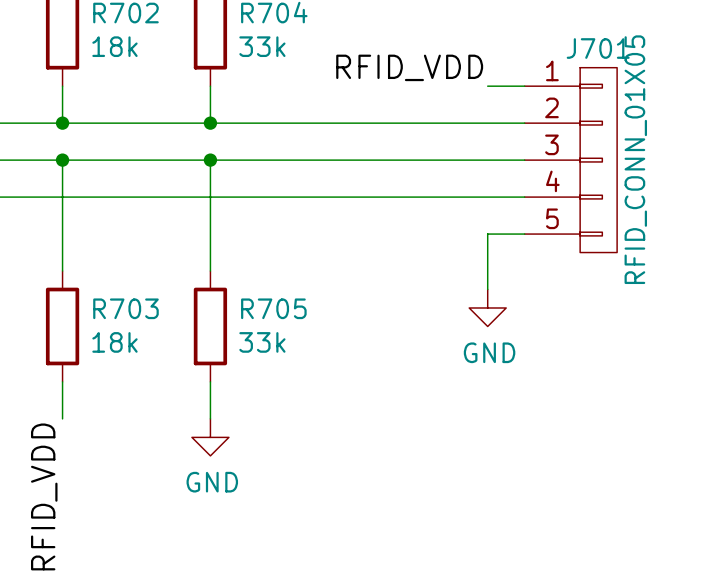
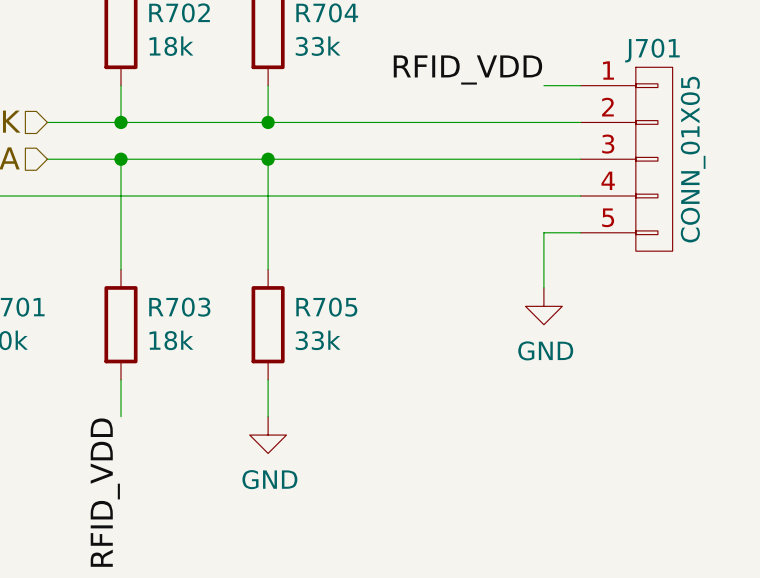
J701 value: RFID_CONN_01X05 (635, 159) -> CONN_01X05 (693, 159)

